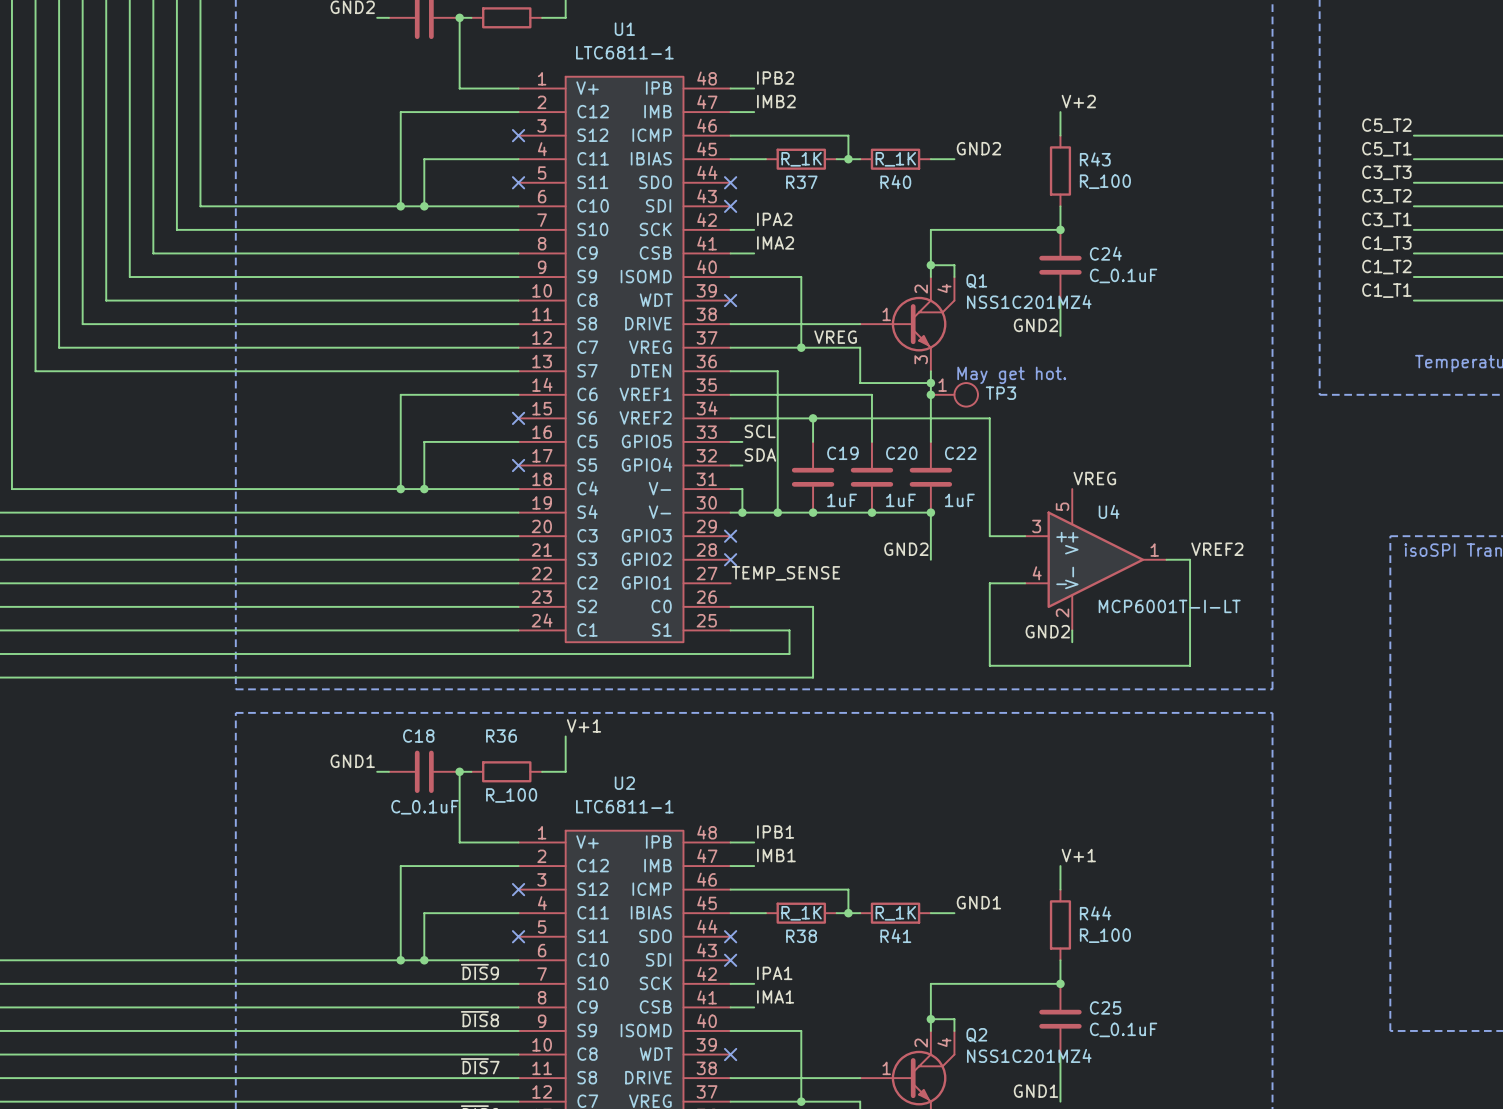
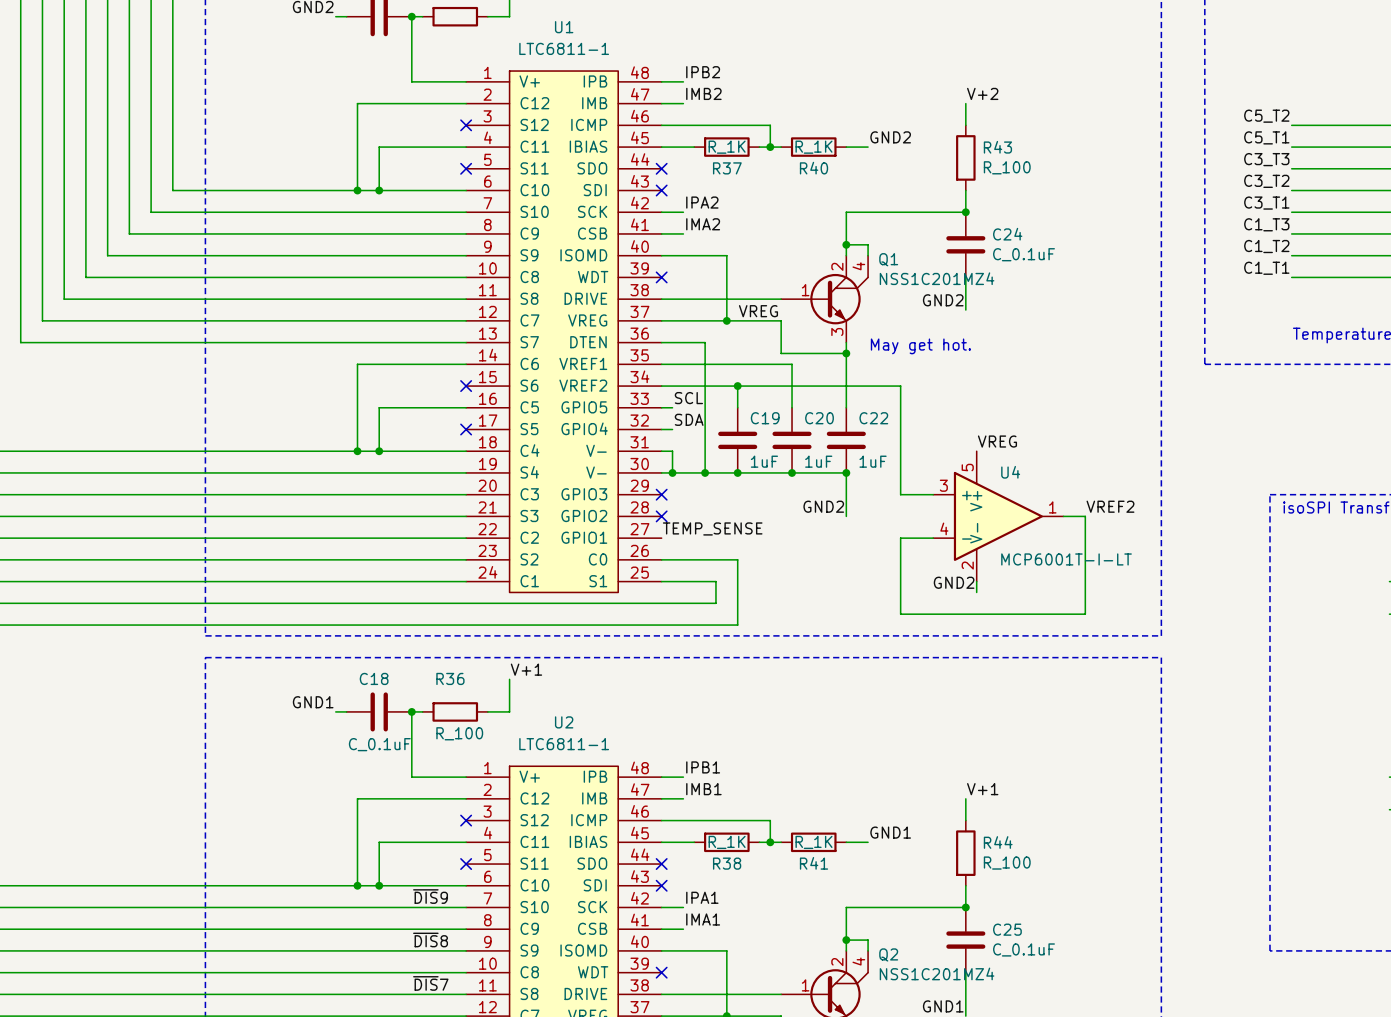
junction: (930, 394) -> none
TP3: (954, 394) -> none

